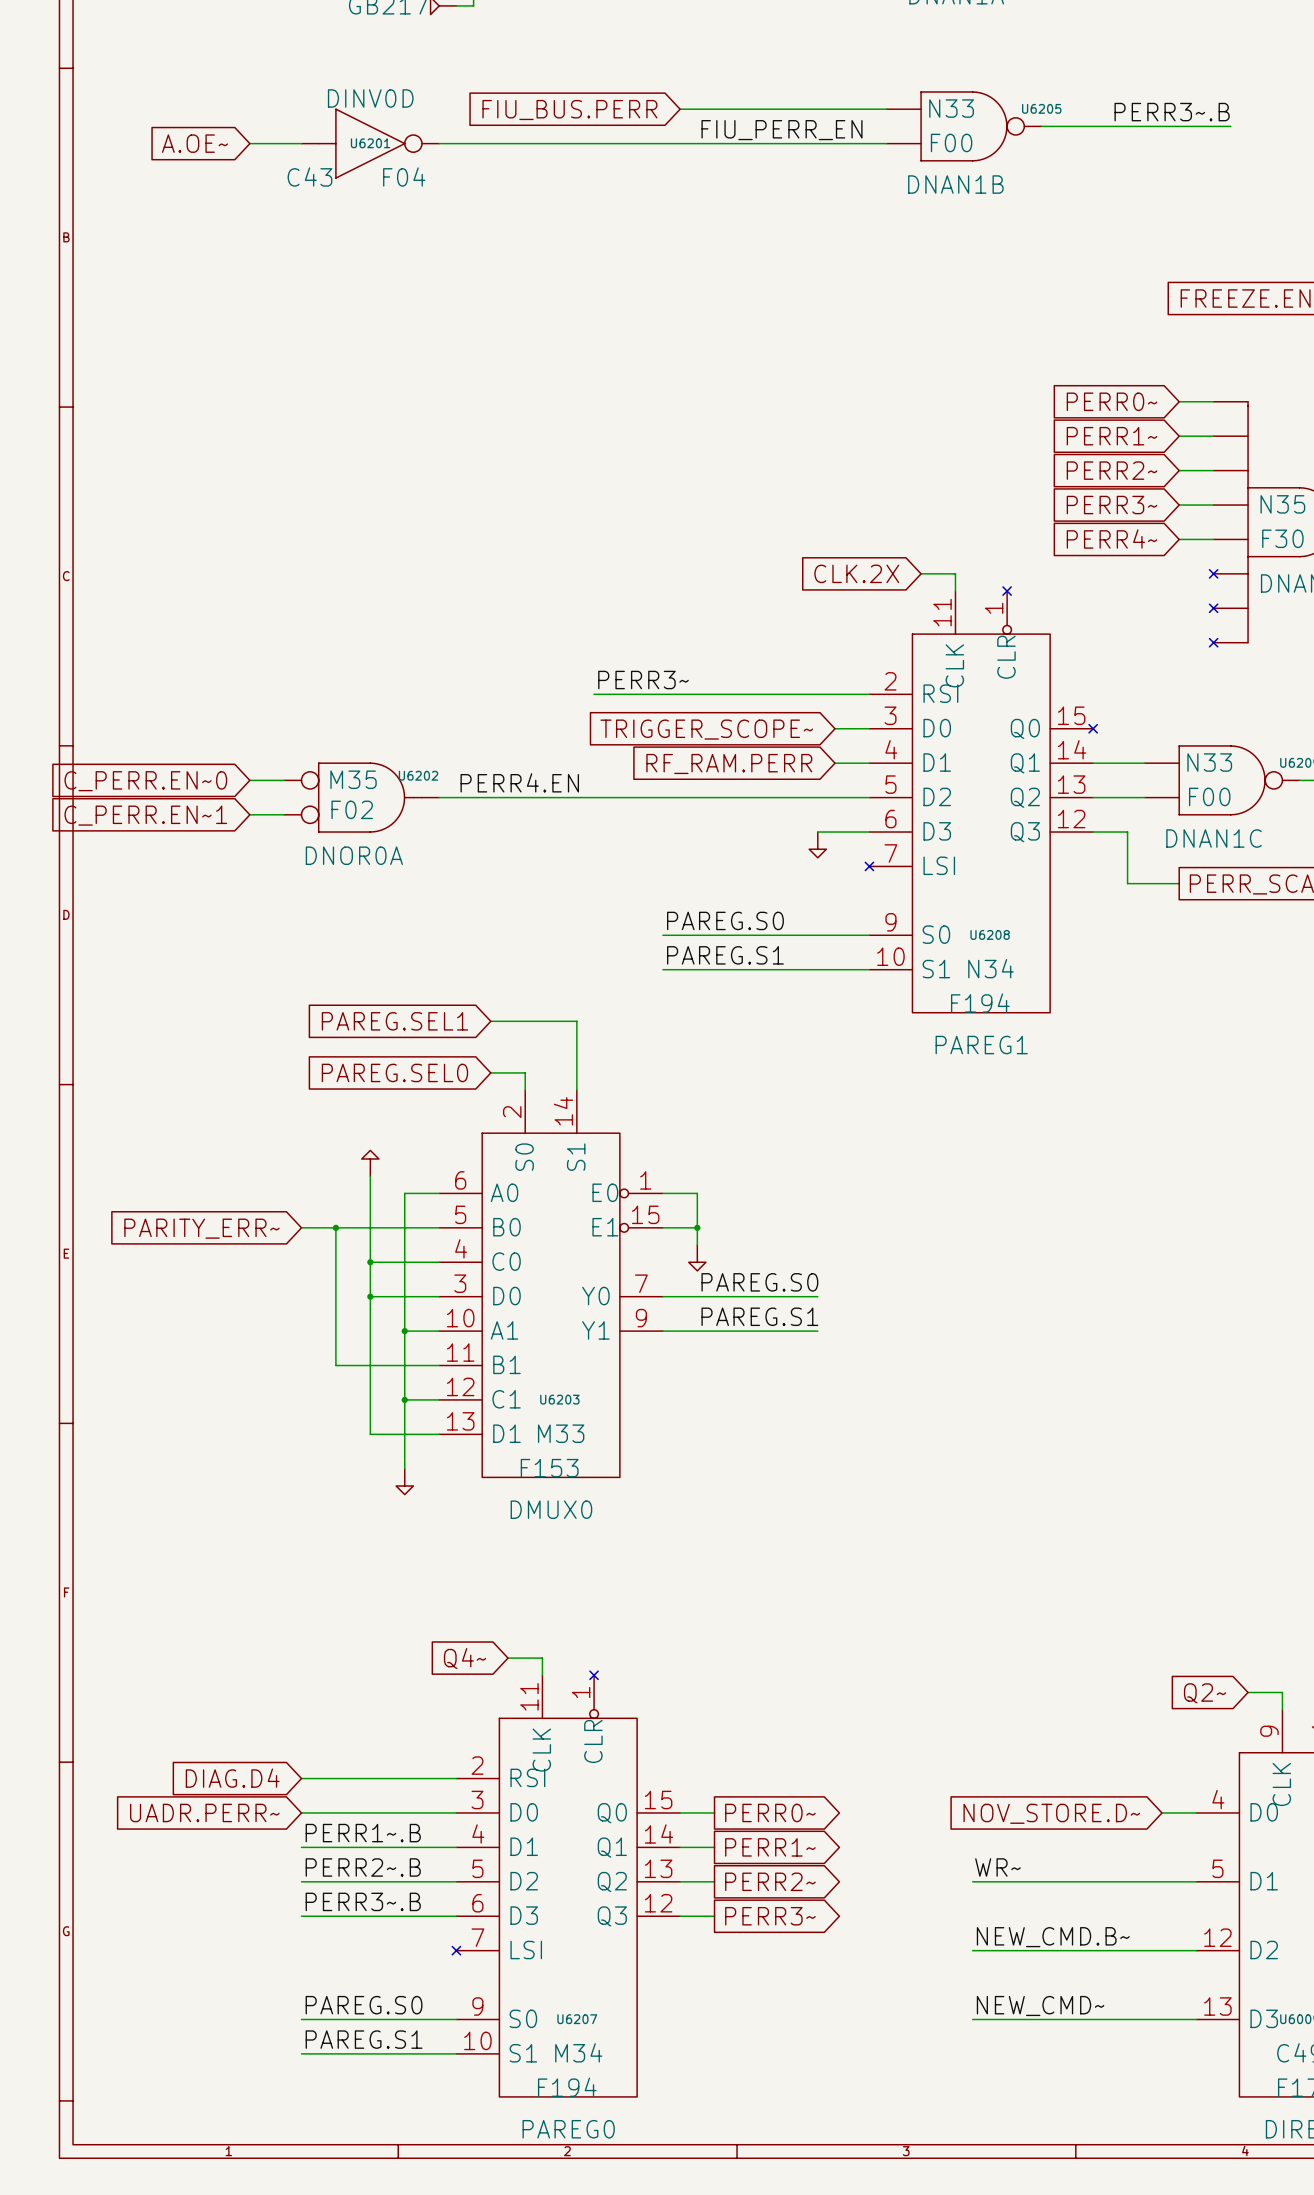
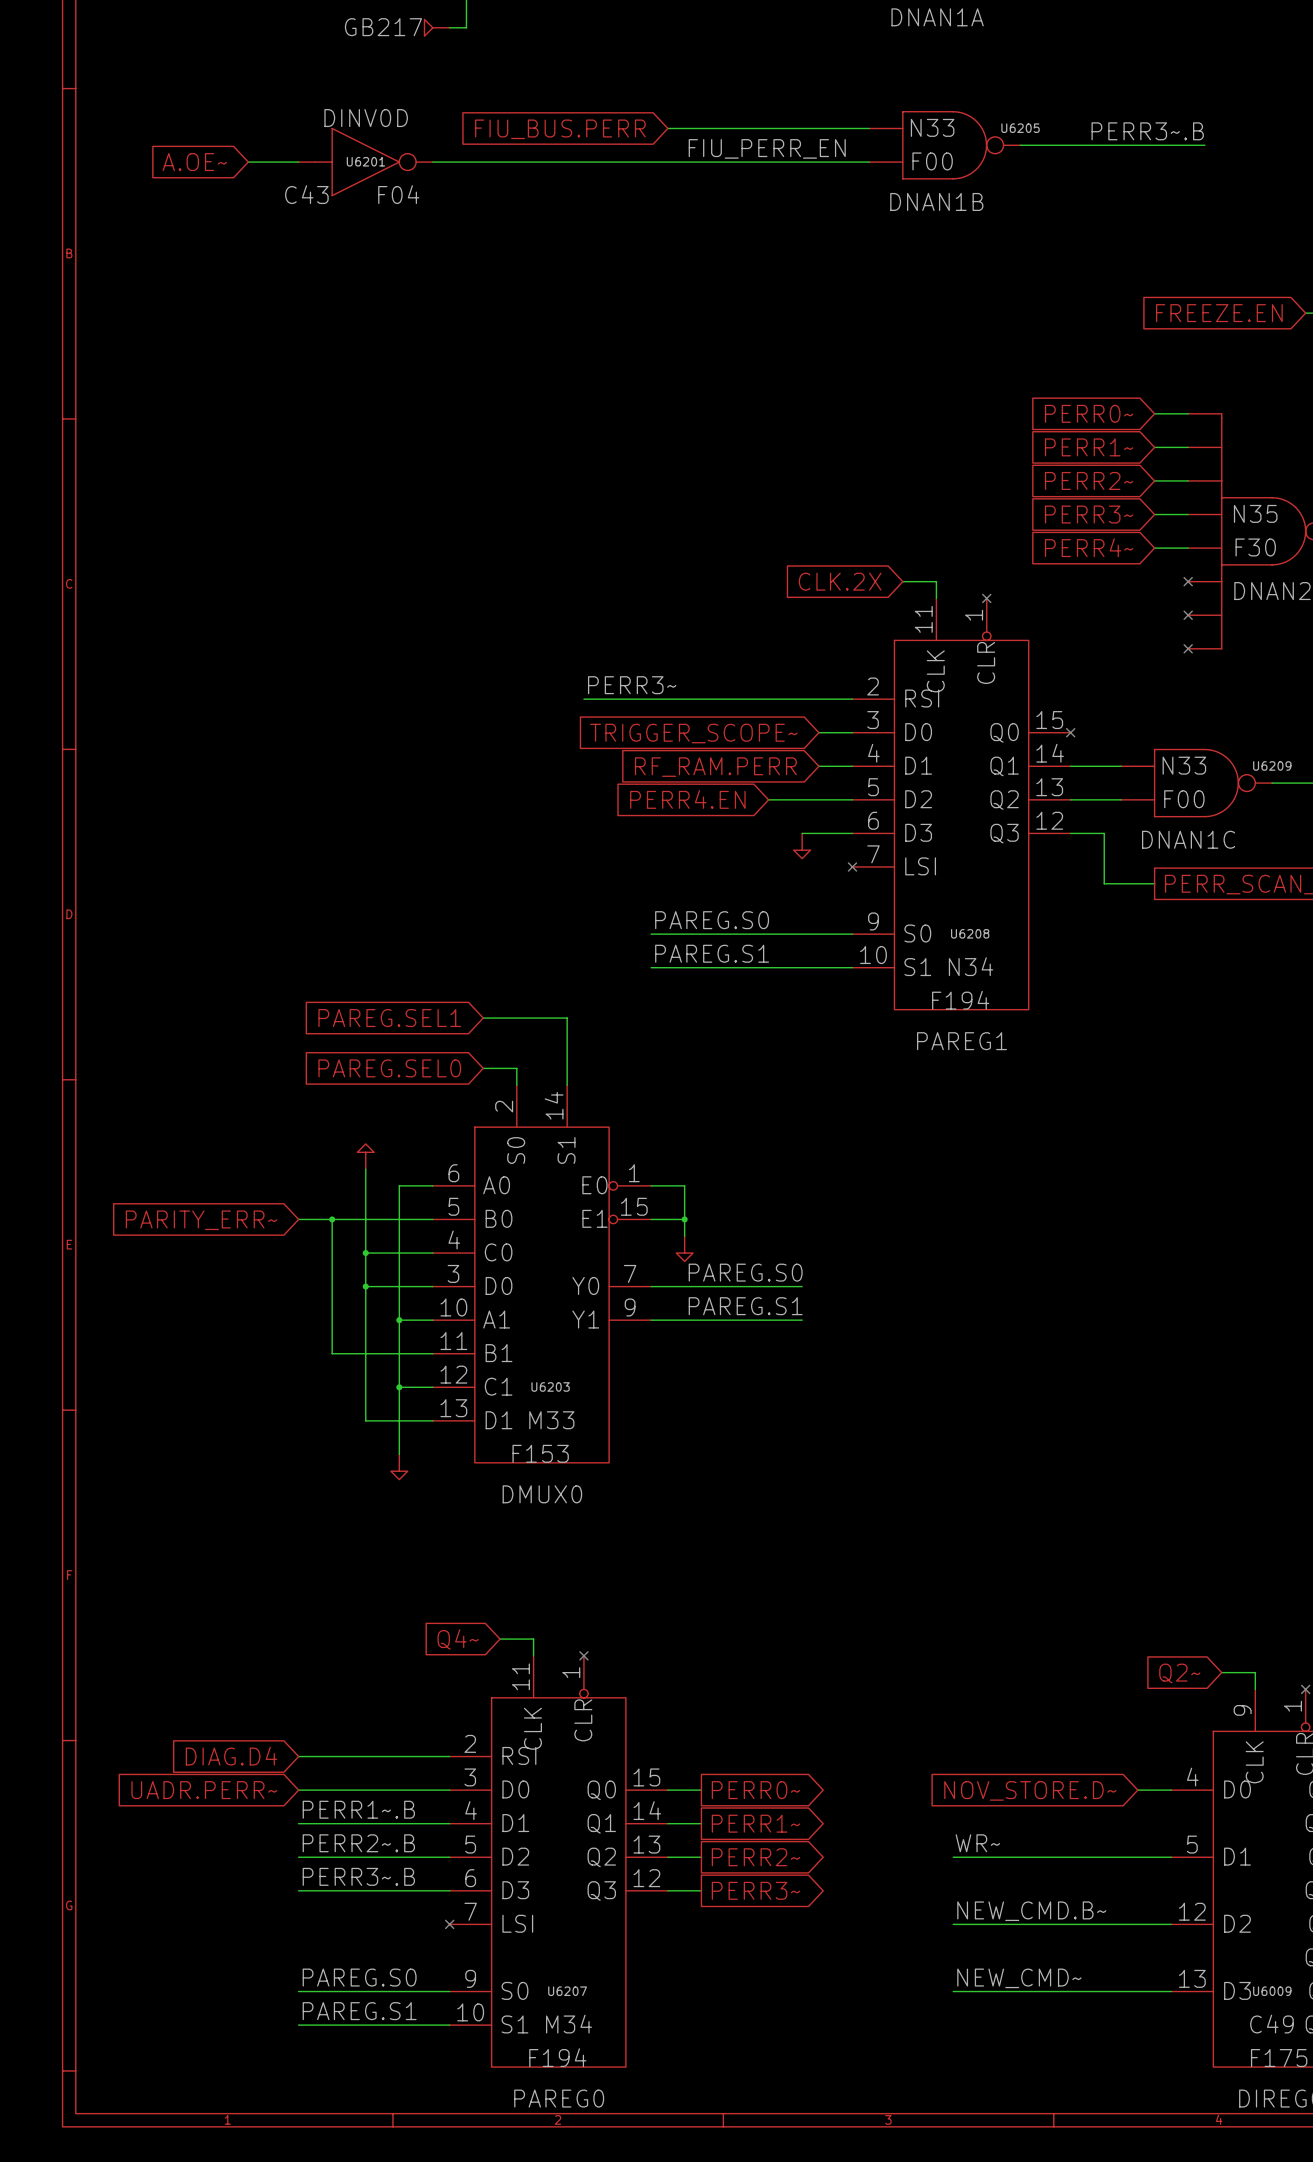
wire: (249, 780) (284, 780) -> none
global label: C_PERR.EN~0 (145, 781) -> none
label: PERR4.EN (519, 782) -> none
U6202: F02 (361, 797) -> none
wire: (439, 797) (783, 797) -> none
global label: none -> PERR4.EN (687, 799)
wire: (249, 814) (284, 814) -> none
global label: C_PERR.EN~1 (145, 815) -> none

